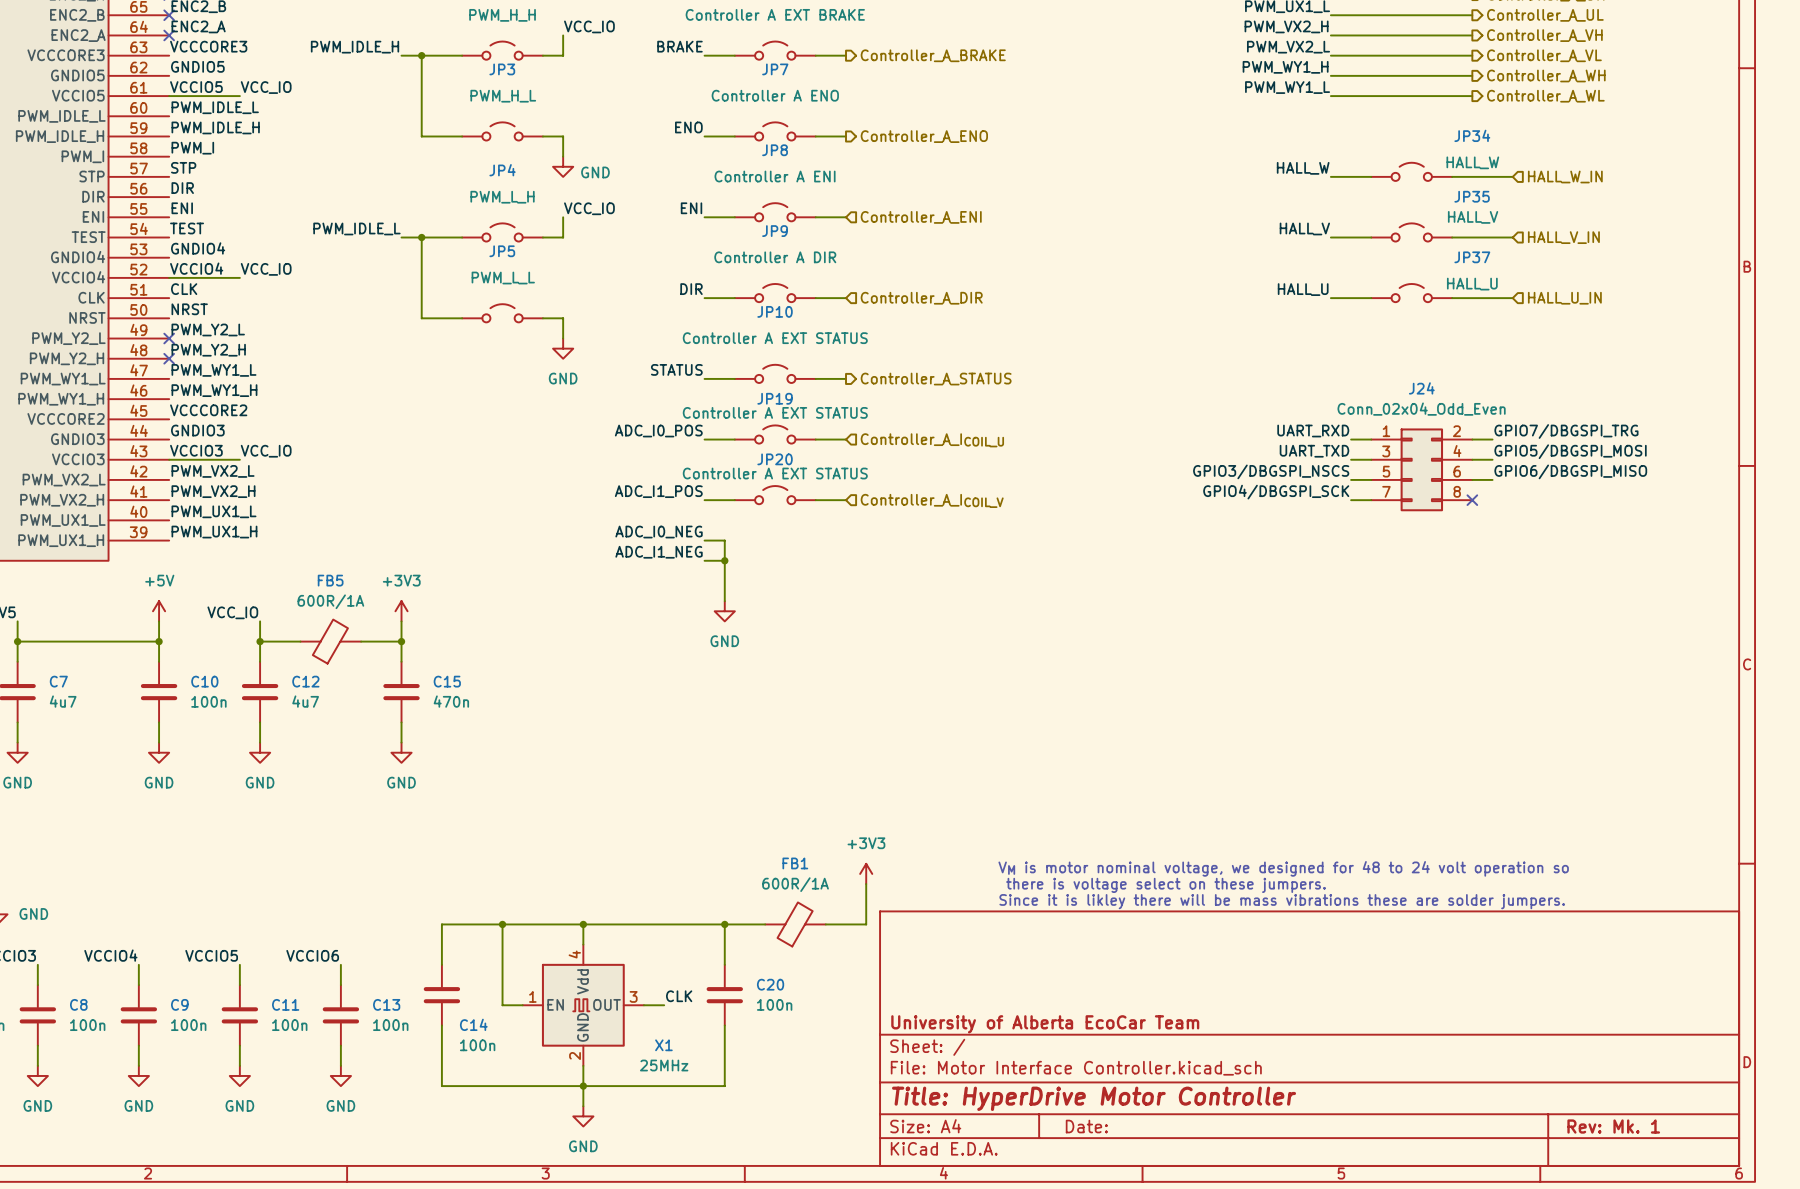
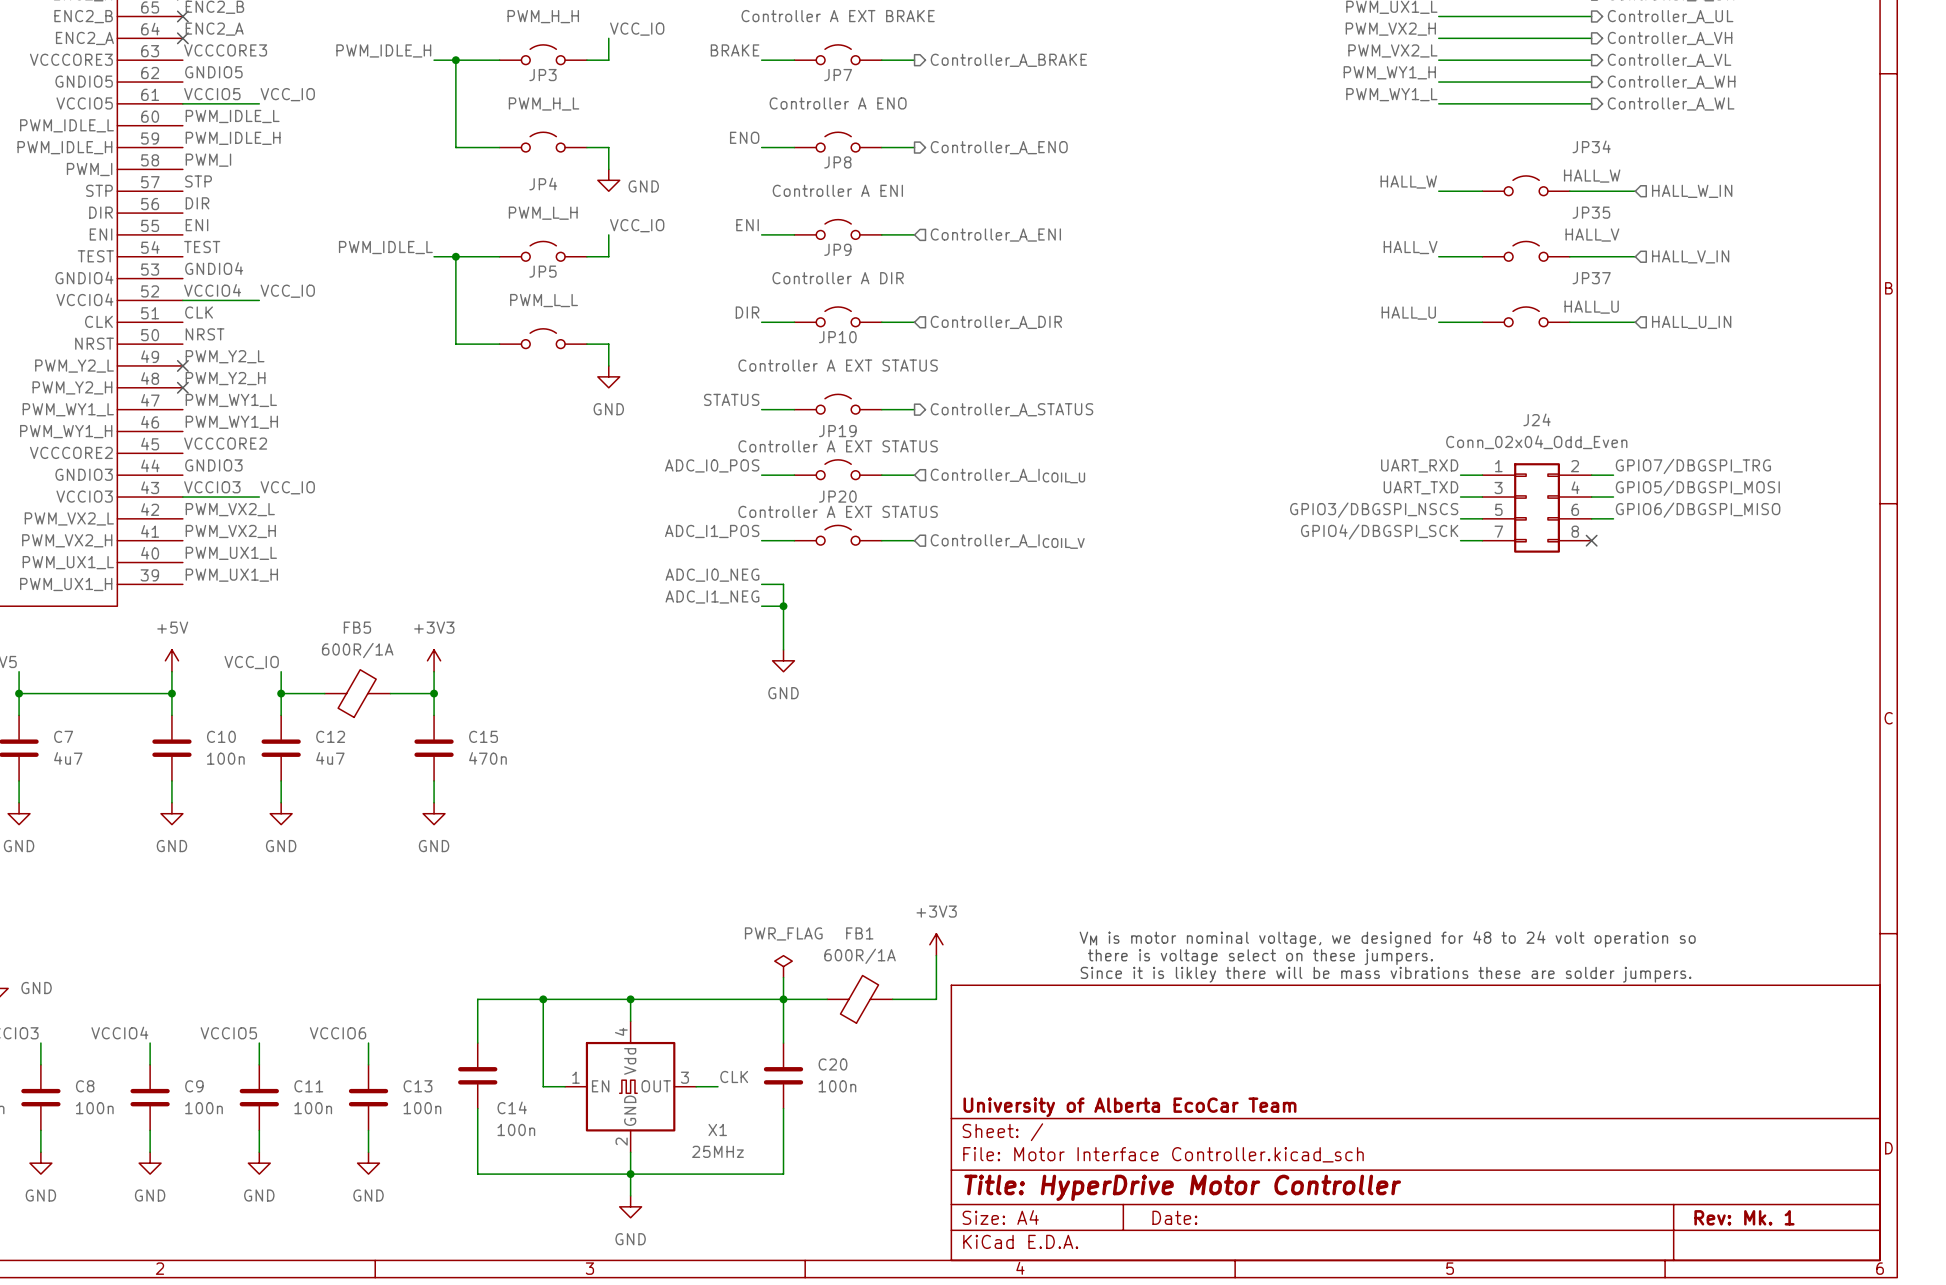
power symbol: none -> PWR_FLAG (783, 966)
wire: none -> (783, 977) (783, 999)

